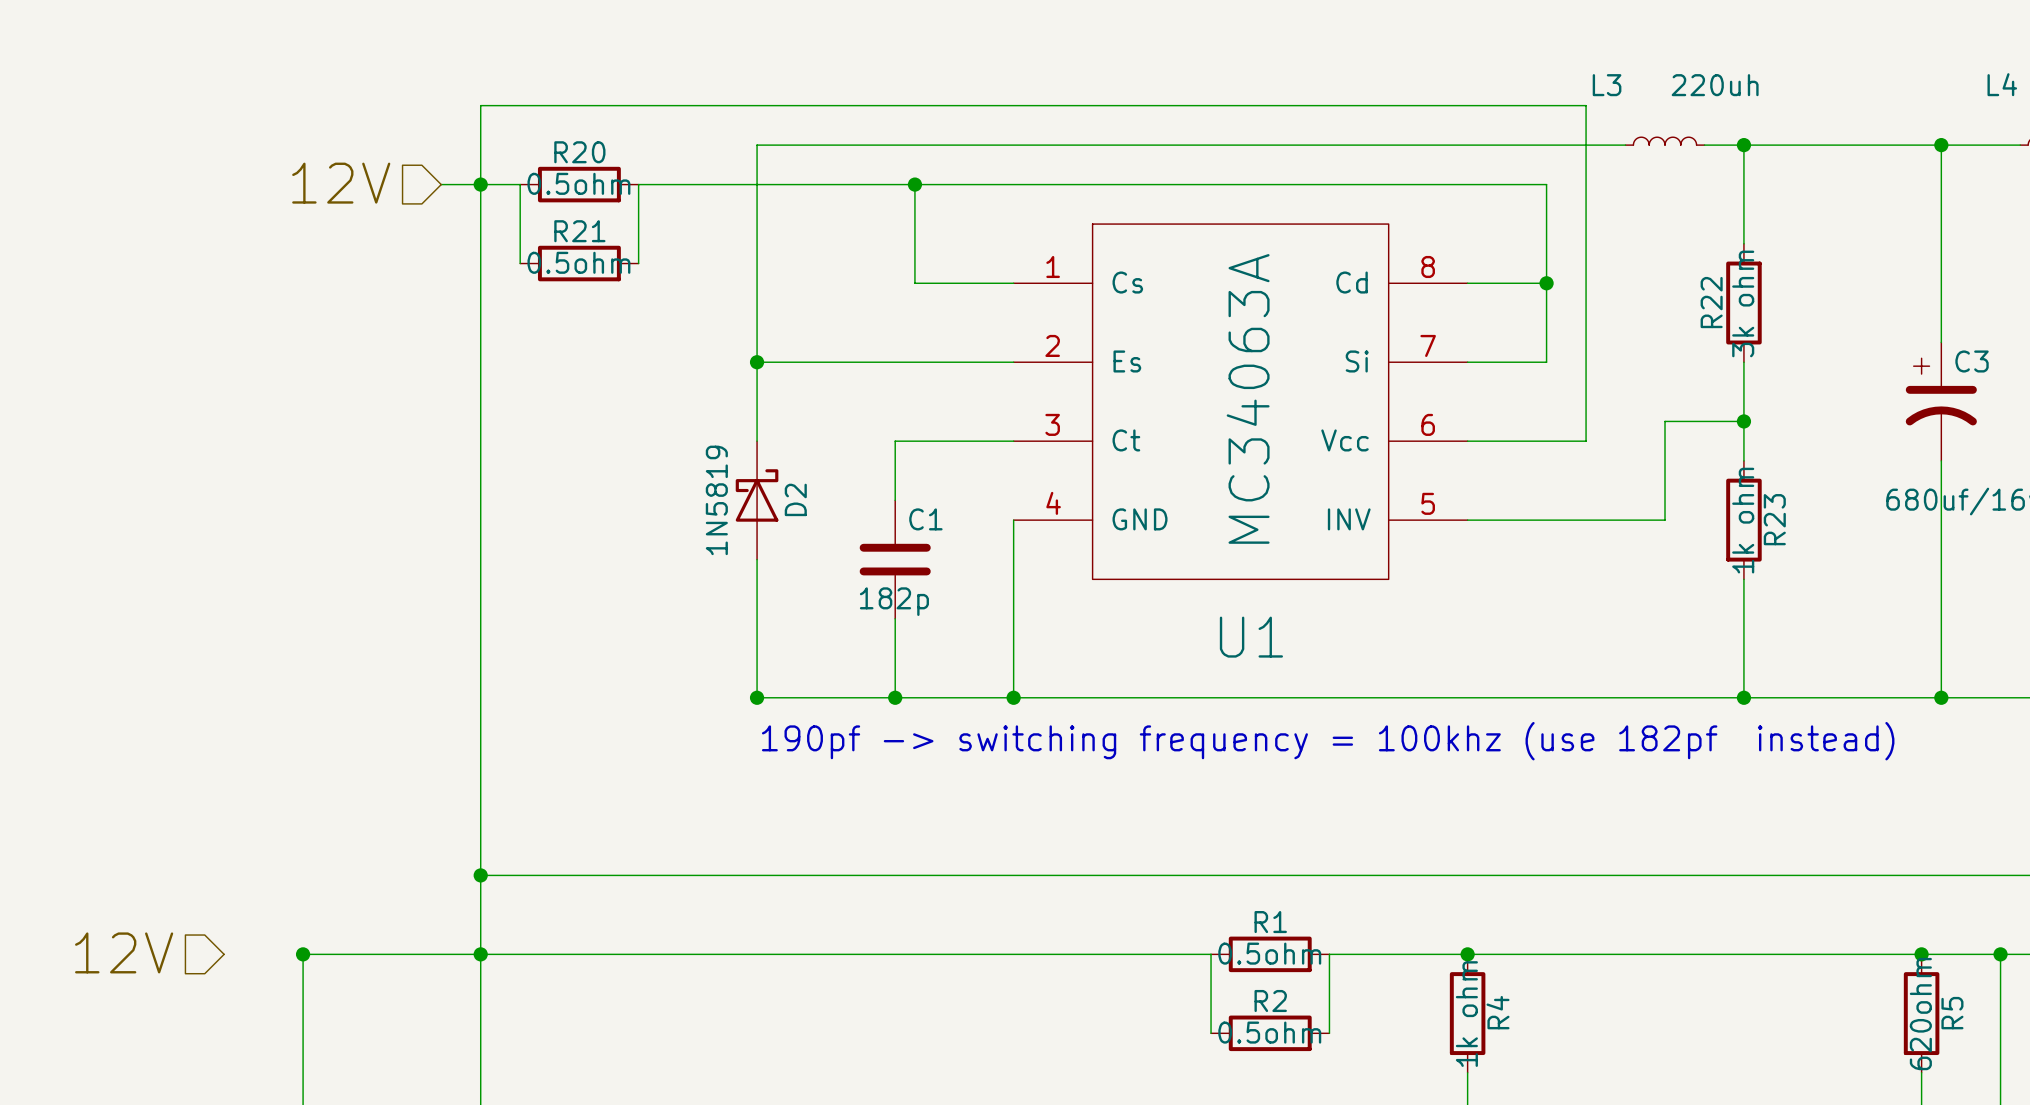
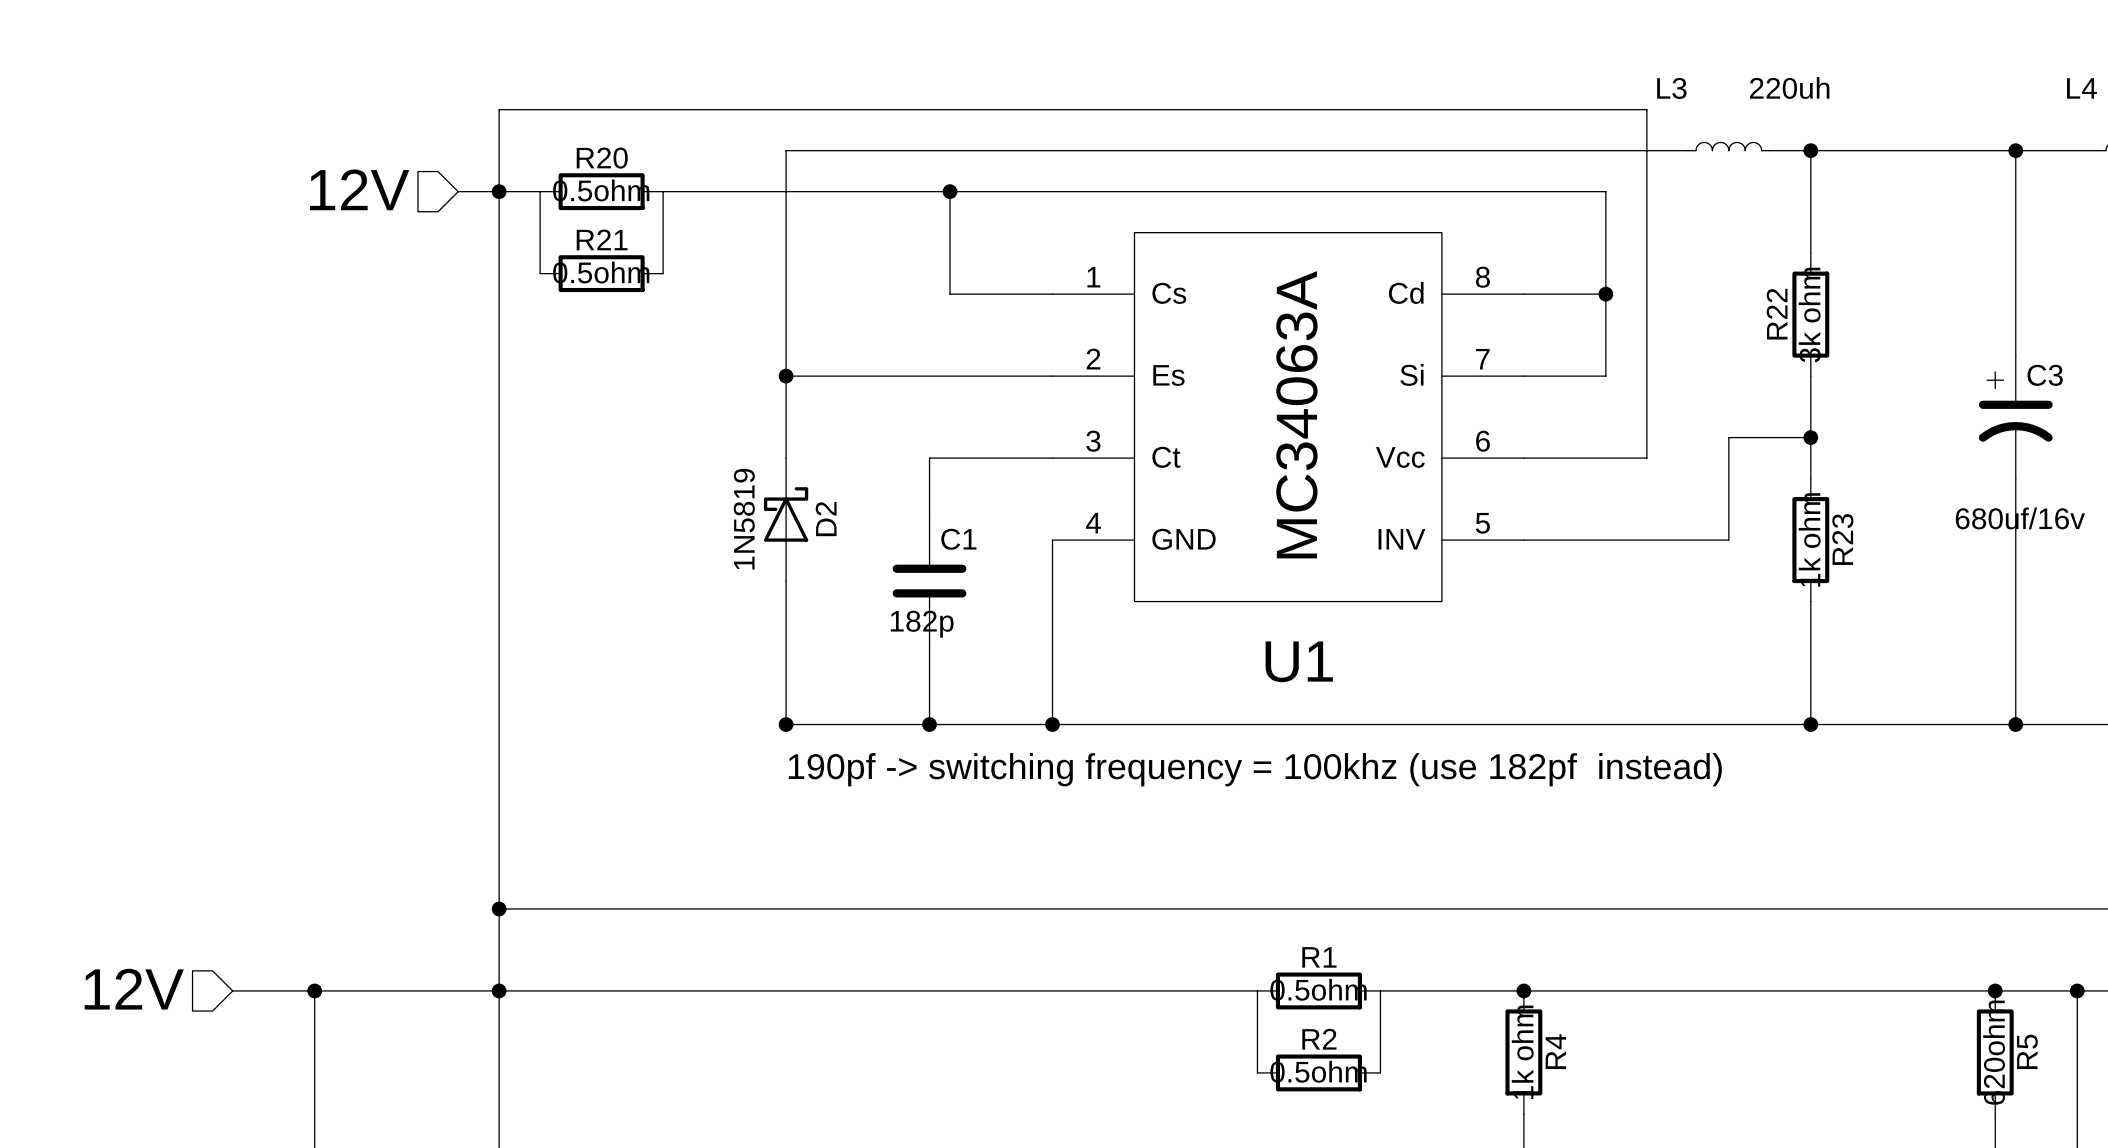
wire: none -> (232, 990) (314, 990)

